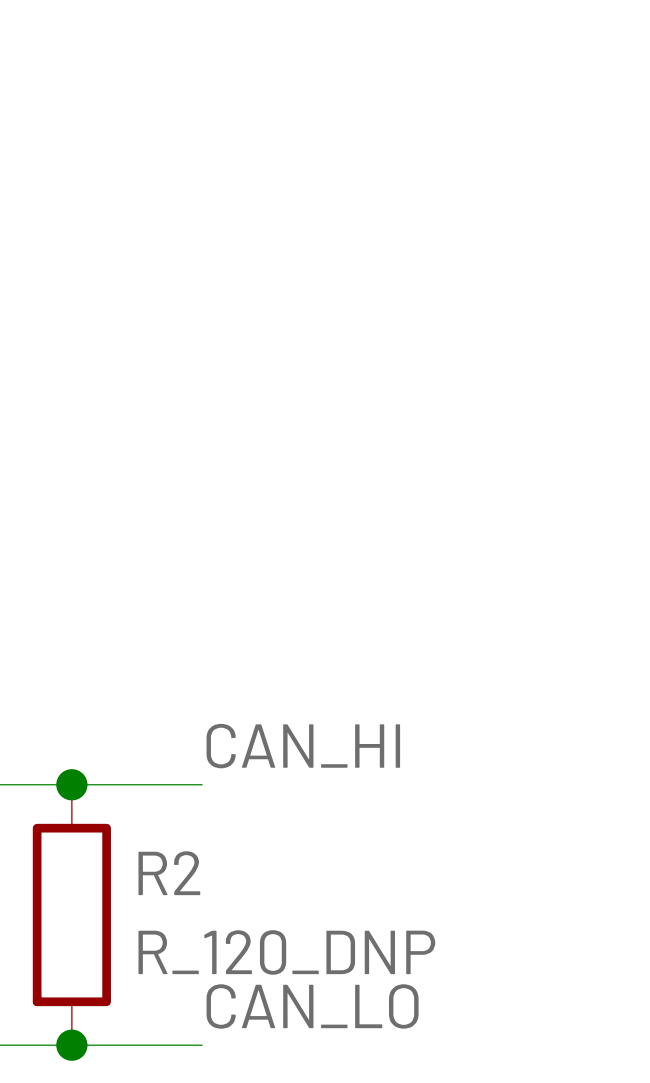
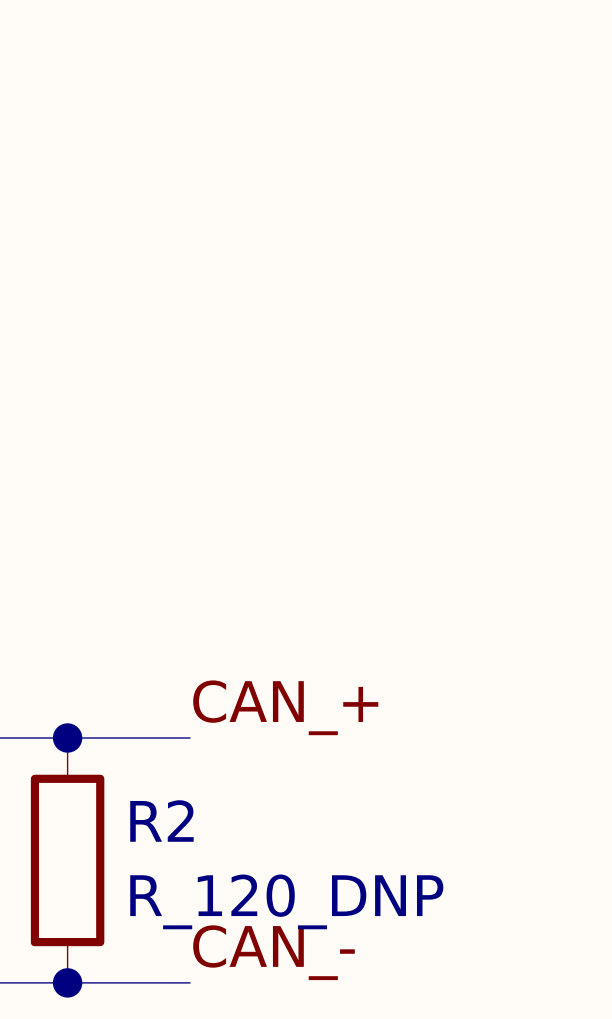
label: CAN_HI (303, 746) -> CAN_+ (285, 707)
label: CAN_LO (312, 1006) -> CAN_- (273, 952)

